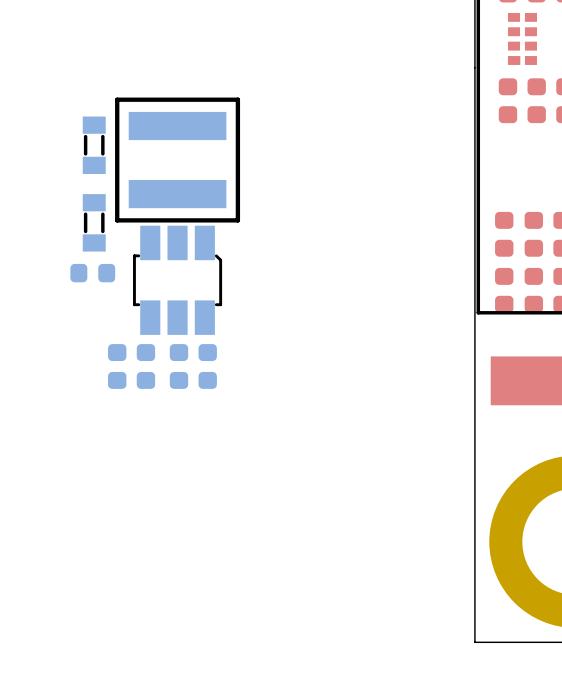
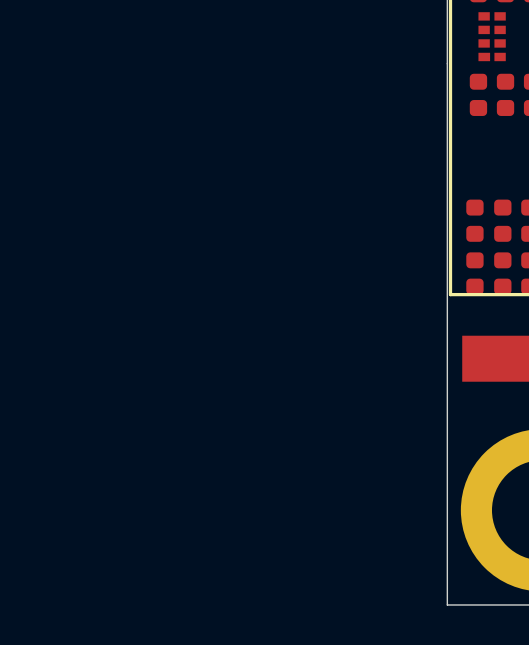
part: (94, 145) -> none
part: (177, 160) -> none
part: (94, 222) -> none
part: (92, 273) -> none
part: (177, 280) -> none
part: (117, 366) -> none
part: (145, 366) -> none
part: (178, 366) -> none
part: (207, 366) -> none

